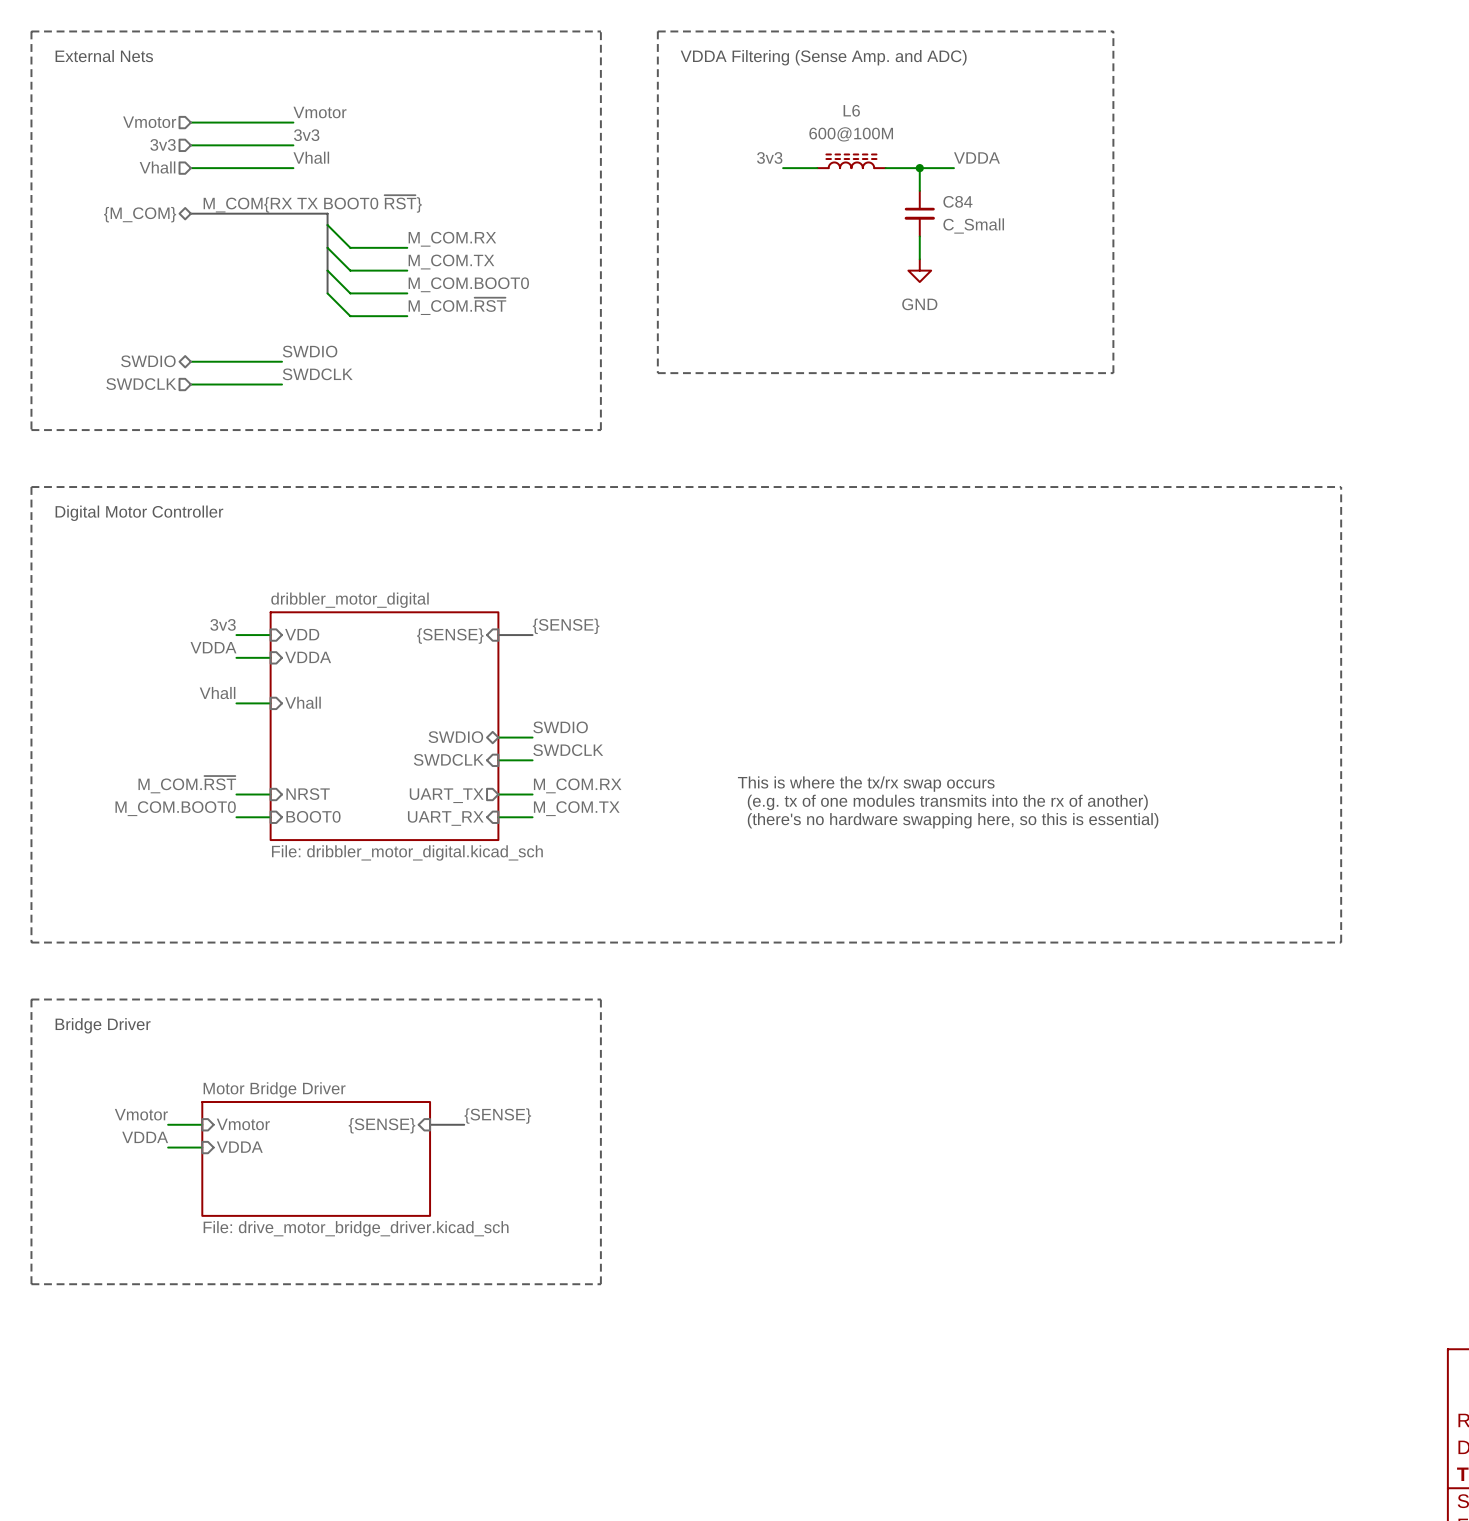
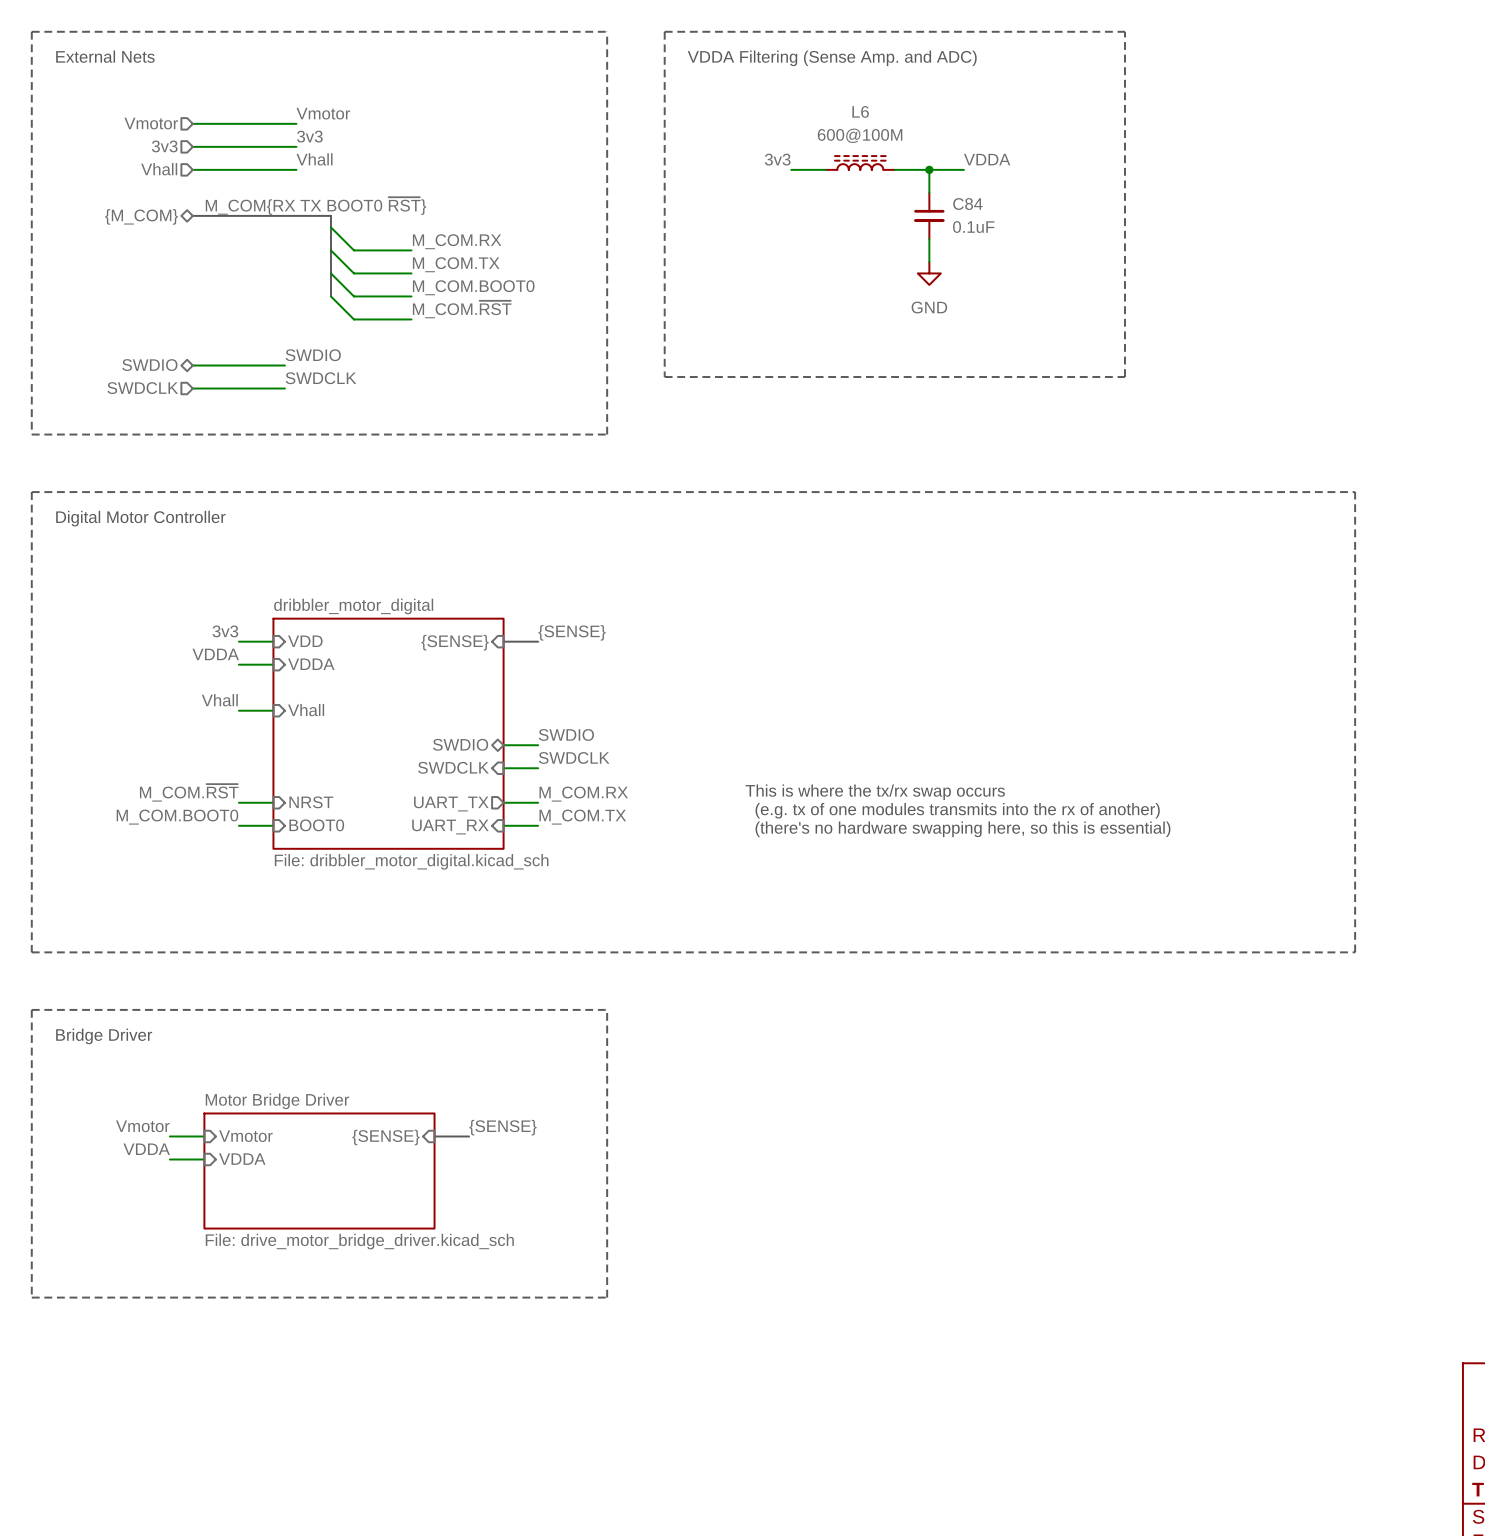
C84 value: C_Small (973, 225) -> 0.1uF (973, 227)

